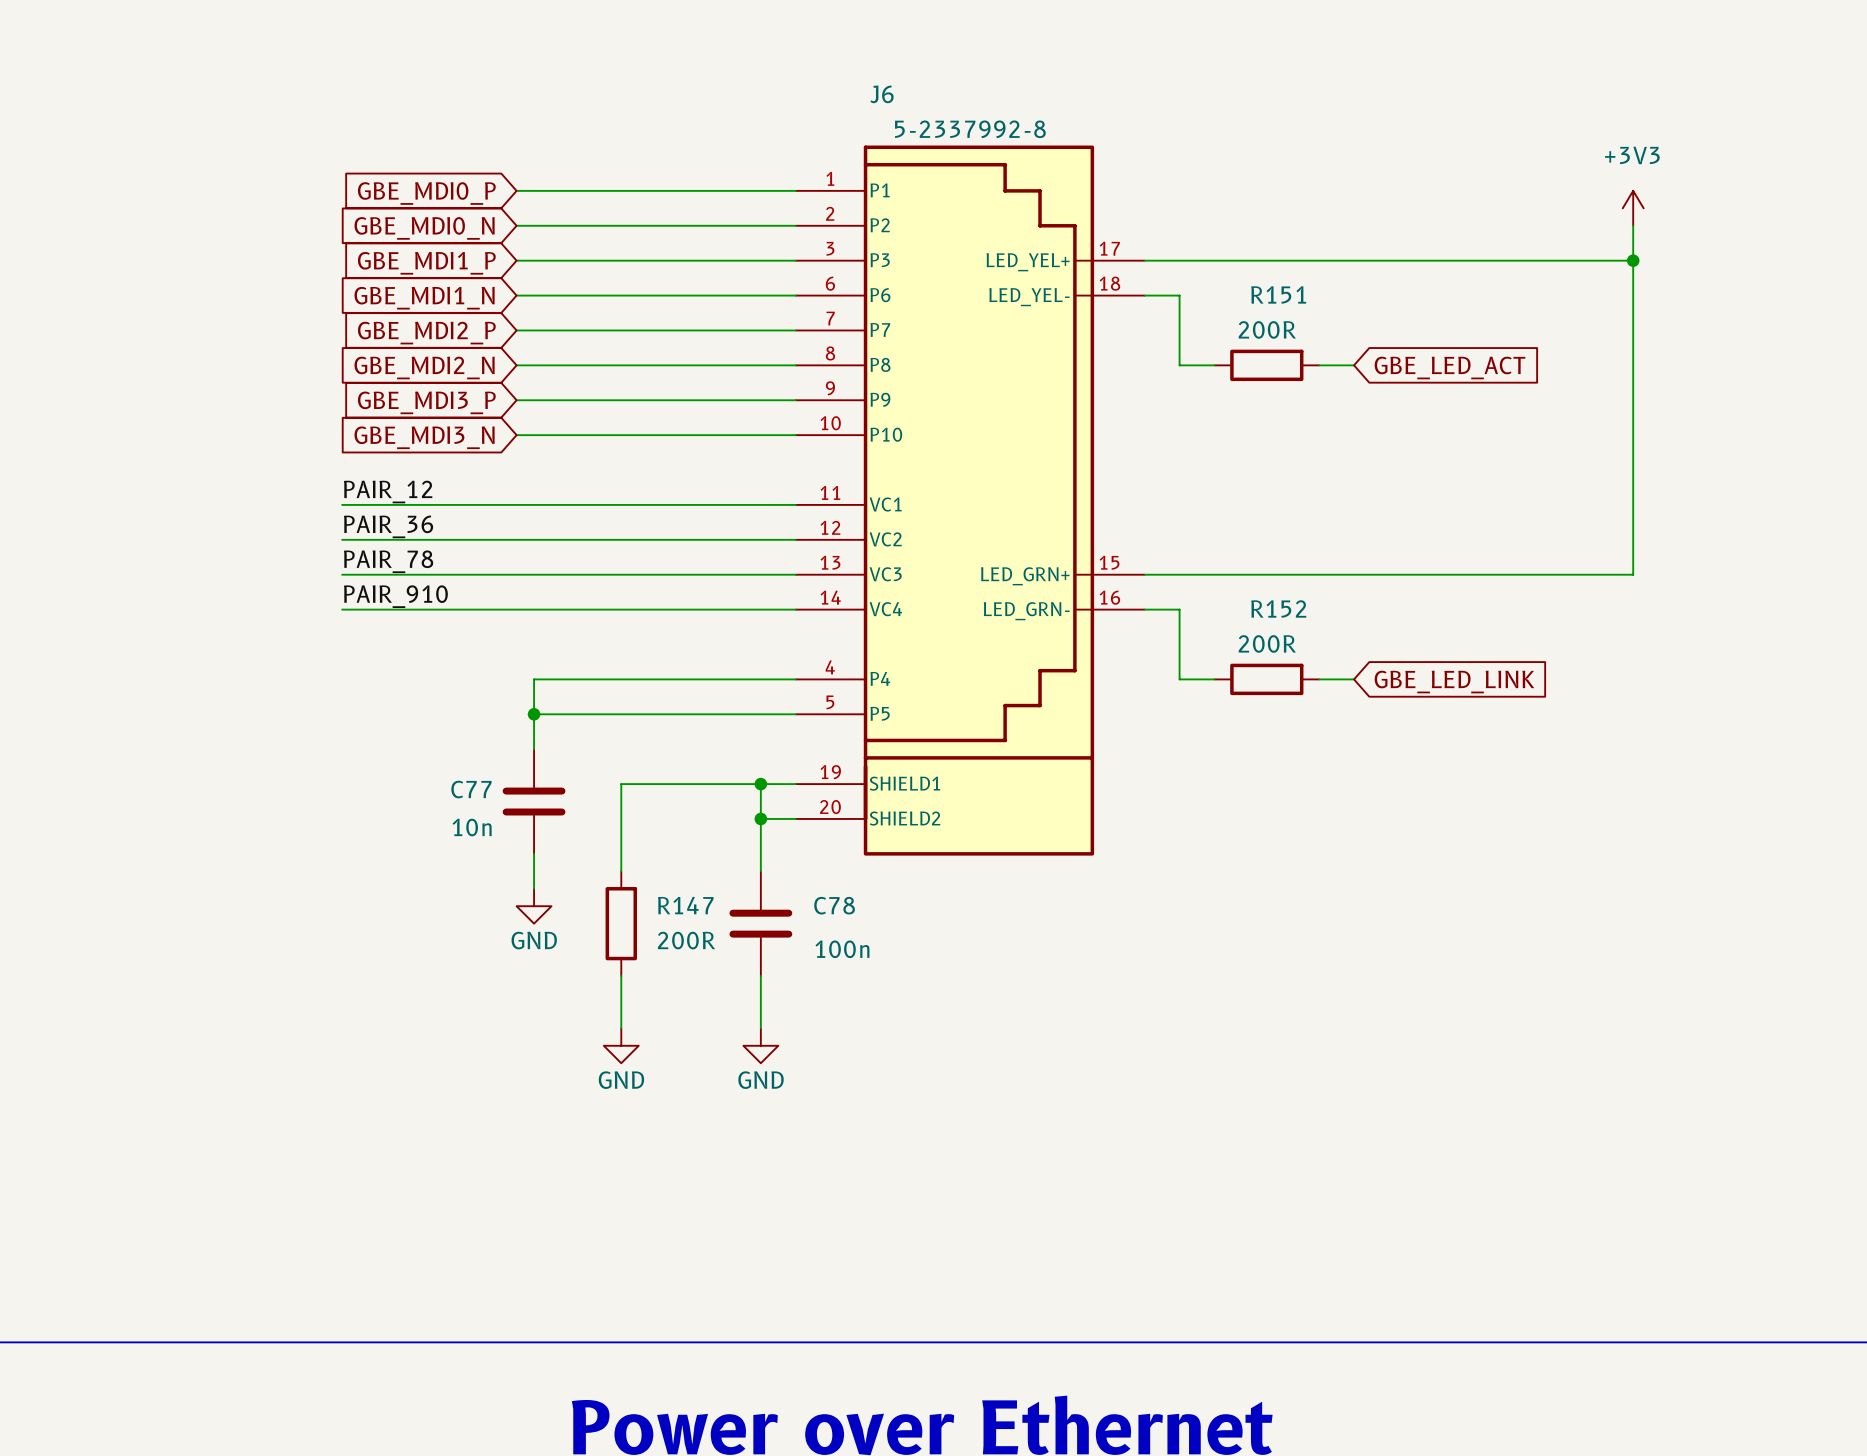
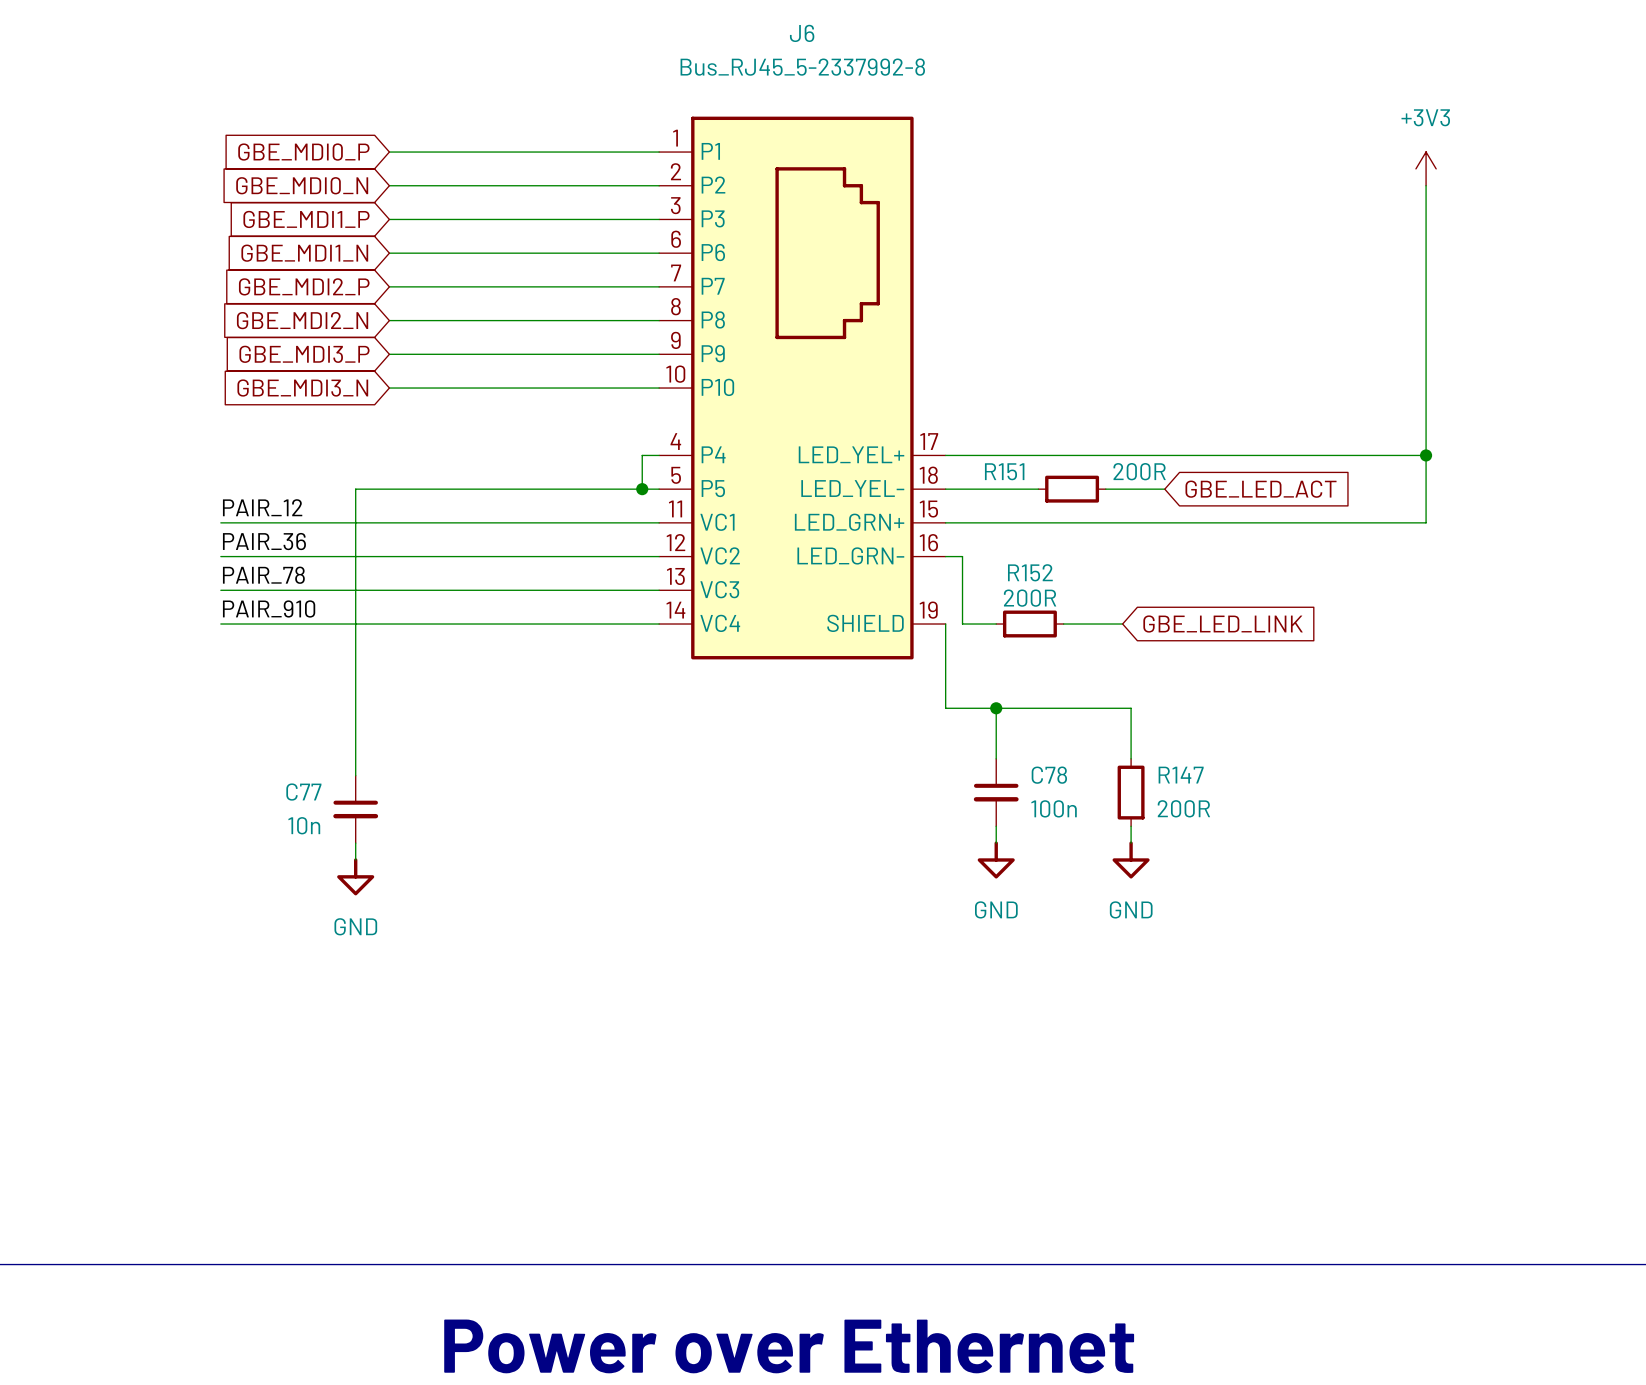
J6 name position: J6 (881, 94) -> J6 (802, 33)
J6 value: 5-2337992-8 (970, 129) -> Bus_RJ45_5-2337992-8 (802, 67)
J6 symbol: [795, 145, 1145, 856] -> [659, 116, 946, 660]
power symbol position: +3V3 (1633, 208) -> +3V3 (1426, 168)
wire: (1633, 225) (1633, 574) (1589, 574) -> (1426, 185) (1426, 522)
wire: (1144, 260) (1633, 260) -> none
junction: (1633, 260) -> none
R151 name position: R151 (1278, 294) -> R151 (1004, 471)
wire: (1144, 295) (1179, 295) (1179, 365) (1214, 365) -> none
R151 text position: 200R (1267, 329) -> 200R (1139, 471)
R151 symbol: [1214, 349, 1320, 382] -> [1038, 475, 1106, 503]
wire: (1319, 365) (1354, 365) -> none
global label position: GBE_LED_ACT (1450, 367) -> GBE_LED_ACT (1261, 489)
label: PAIR_12 (388, 491) -> none
wire: (342, 504) (778, 504) -> (642, 489) (642, 455)
wire: none -> (945, 455) (1426, 455)
junction: none -> (1426, 455)
label: PAIR_36 (388, 526) -> none
wire: (342, 539) (481, 539) -> (355, 775) (355, 489)
junction: none -> (642, 489)
wire: none -> (945, 489) (1038, 489)
wire: none -> (1105, 489) (1164, 489)
label: PAIR_78 (388, 561) -> PAIR_12 (262, 507)
label: PAIR_910 (395, 596) -> PAIR_36 (264, 541)
R152 name position: R152 (1278, 608) -> R152 (1030, 572)
wire: none -> (945, 556) (962, 556) (962, 624) (996, 624)
wire: (1144, 609) (1179, 609) (1179, 679) (1214, 679) -> (1122, 624) (1063, 624)
label: none -> PAIR_78 (263, 575)
wire: none -> (220, 590) (659, 590)
R152 symbol: [1214, 663, 1320, 696] -> [996, 610, 1064, 638]
label: none -> PAIR_910 (269, 608)
wire: (534, 679) (534, 749) -> (406, 624) (220, 624)
wire: none -> (945, 624) (945, 708) (1131, 708) (1131, 758)
wire: (1319, 679) (1354, 679) -> none
global label position: GBE_LED_LINK (1454, 682) -> GBE_LED_LINK (1223, 624)
wire: (534, 714) (795, 714) -> none
junction: (534, 714) -> none
C77 symbol: [502, 749, 566, 854] -> [333, 775, 379, 844]
wire: none -> (996, 708) (996, 758)
junction: none -> (996, 708)
wire: (760, 784) (760, 871) -> none
junction: (760, 784) -> none
wire: (795, 784) (621, 784) (621, 871) -> none
wire: (760, 818) (795, 818) -> none
junction: (760, 818) -> none
wire: (534, 853) (534, 888) -> none
R147 symbol: [605, 871, 637, 976] -> [1117, 758, 1145, 827]
C78 symbol: [729, 871, 793, 976] -> [973, 758, 1019, 827]
wire: none -> (996, 826) (996, 843)
wire: none -> (1131, 826) (1131, 843)
wire: none -> (355, 843) (355, 859)
power symbol: GND (534, 906) -> none
power symbol: none -> GND (996, 859)
power symbol: none -> GND (1131, 859)
power symbol: none -> GND (355, 876)
wire: (621, 975) (621, 1028) -> none
wire: (760, 975) (760, 1028) -> none
power symbol: GND (621, 1045) -> none
power symbol: GND (760, 1045) -> none

